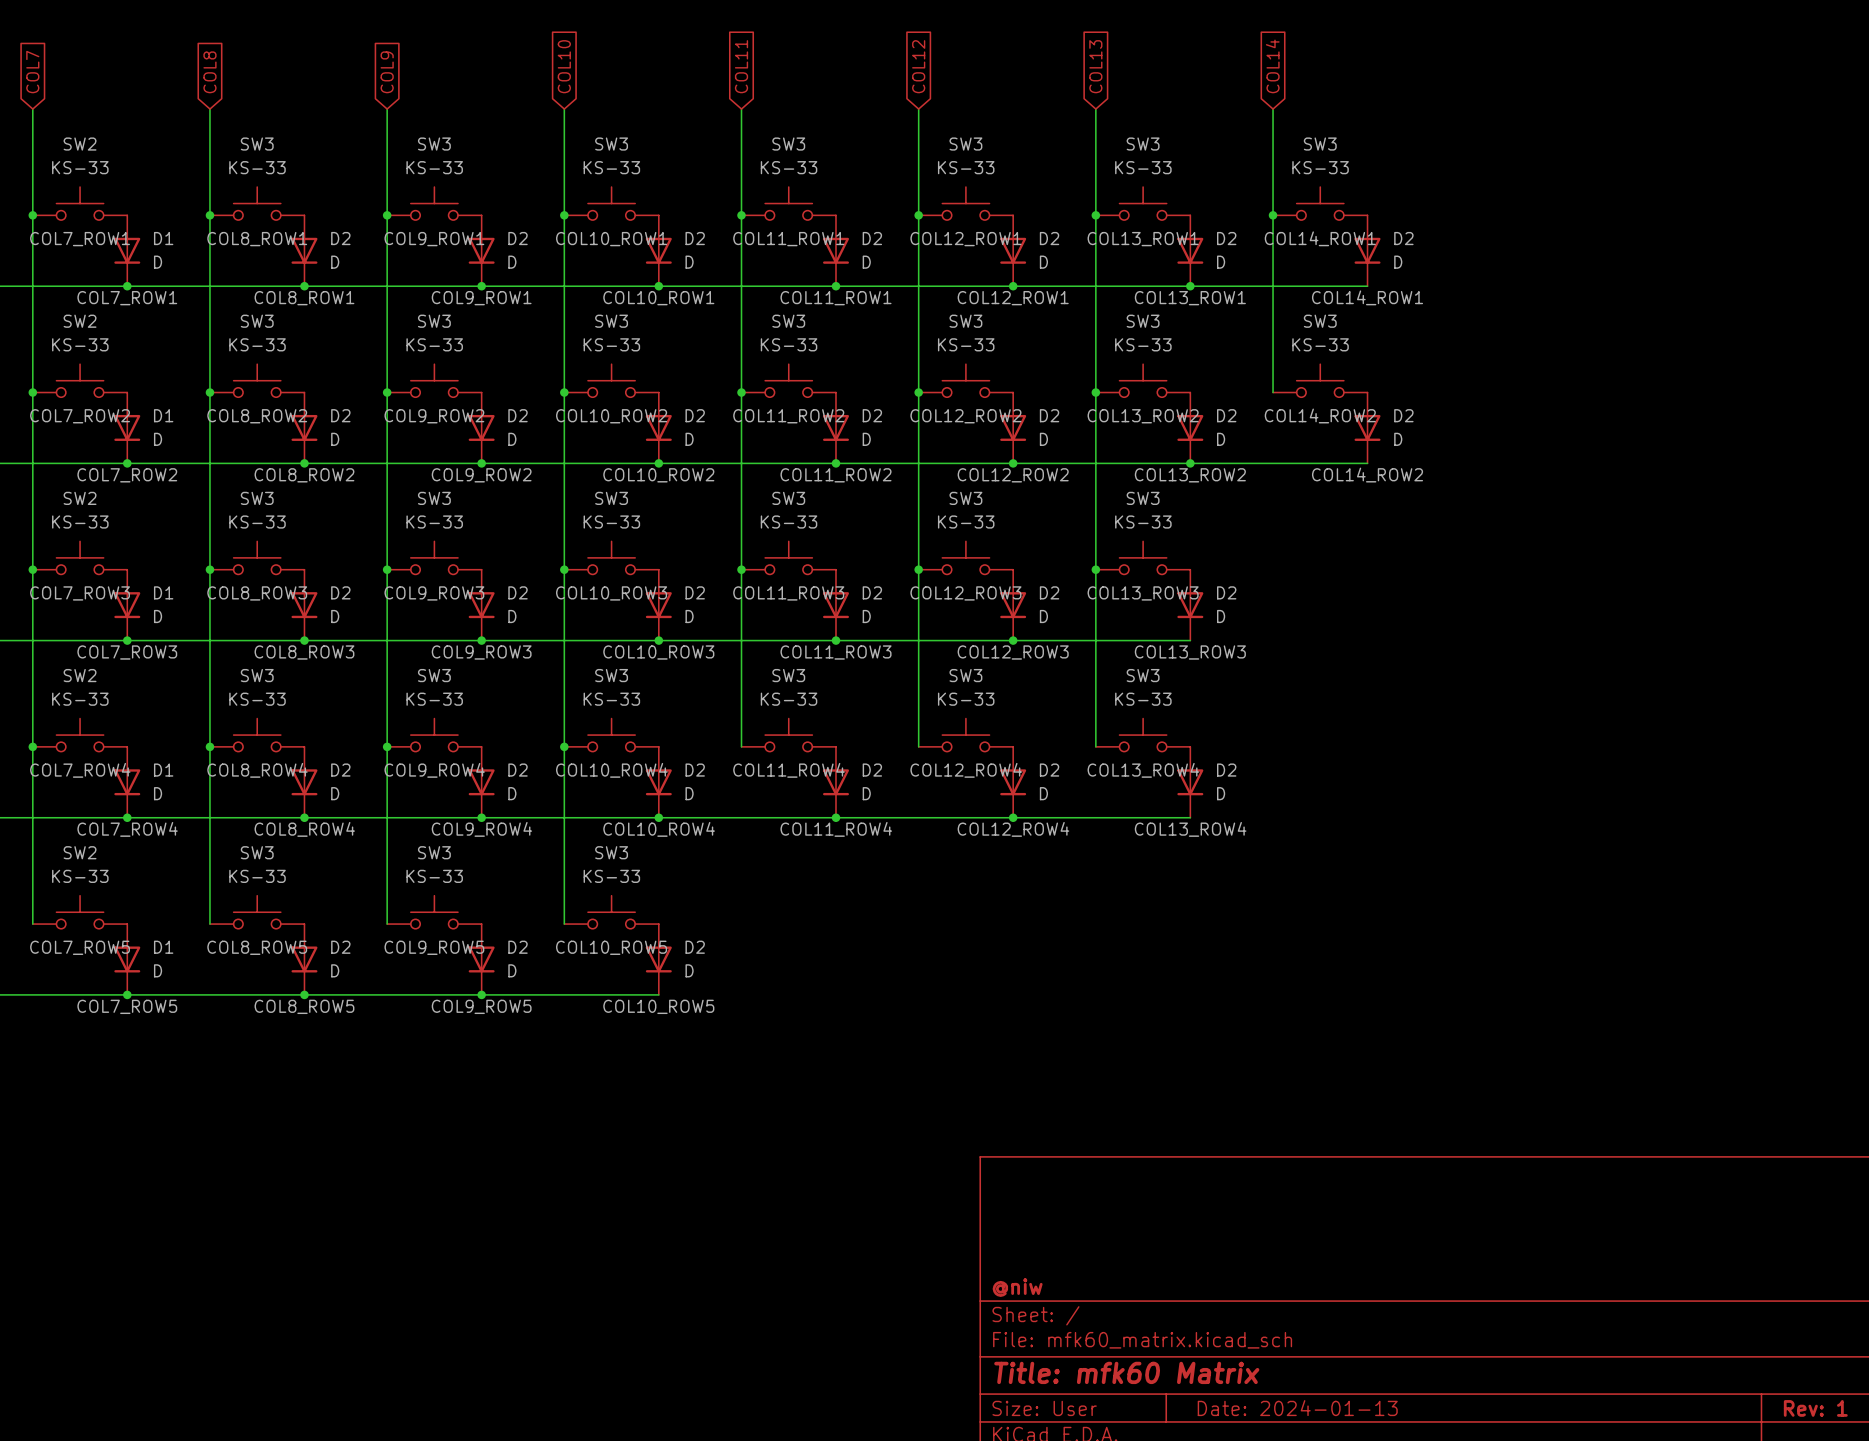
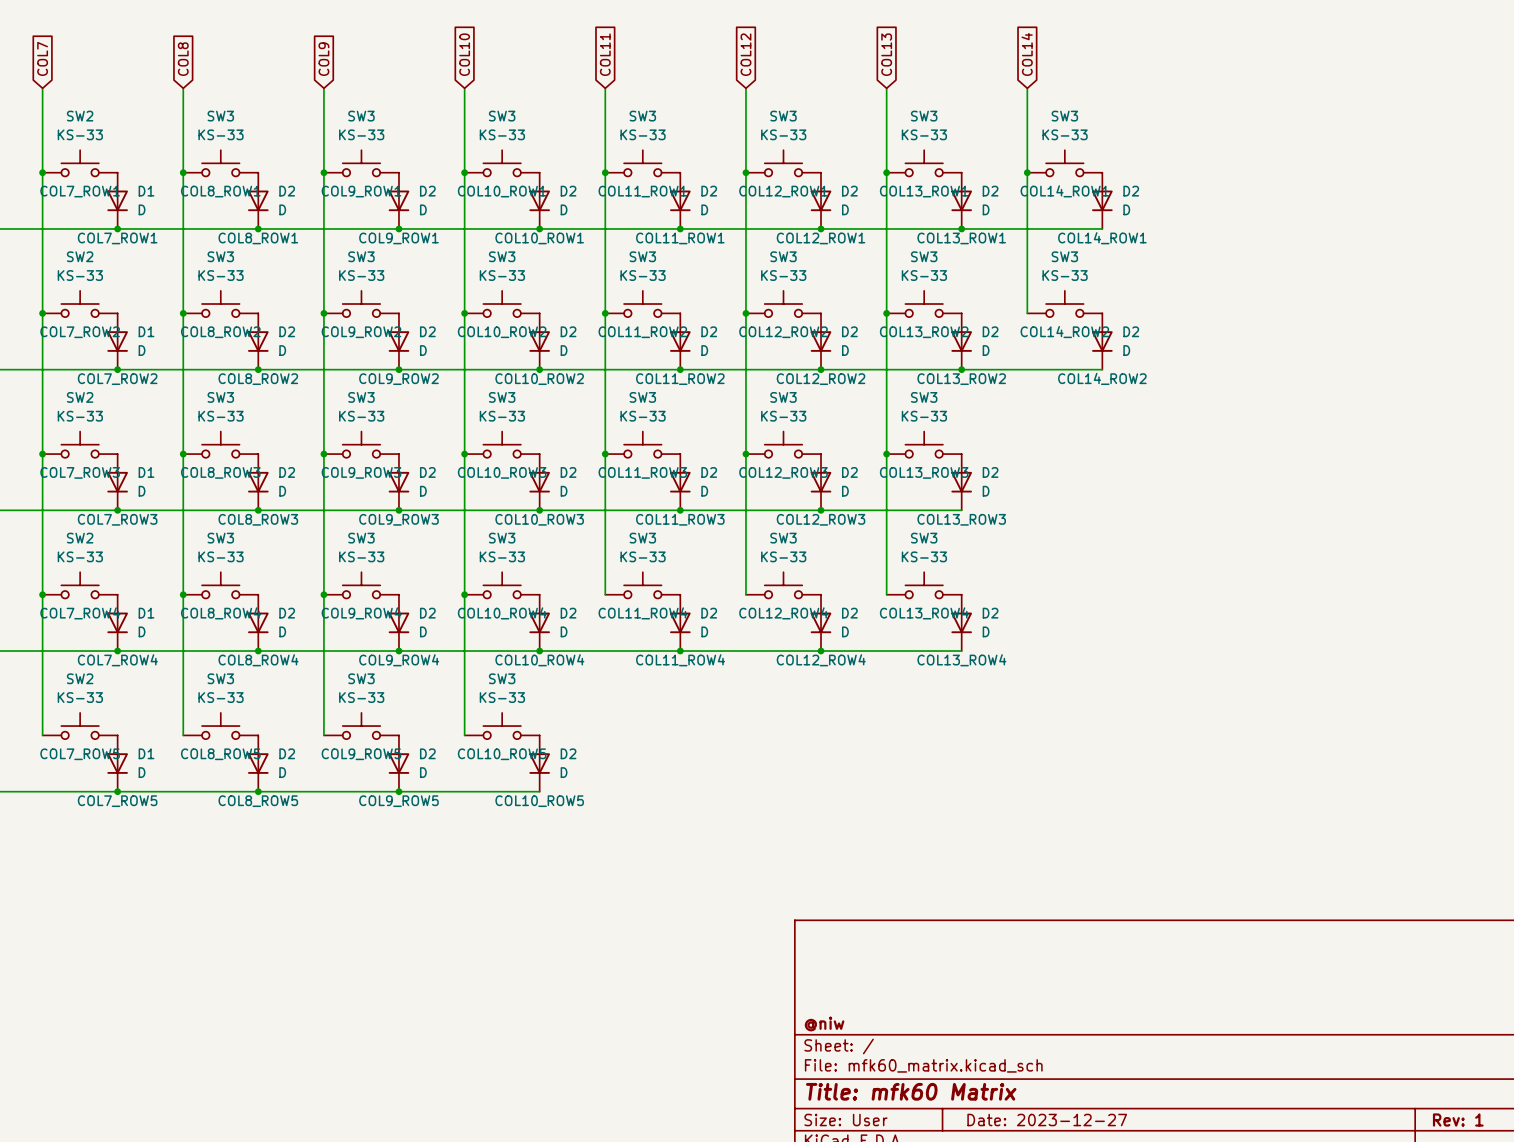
title block: Date: 2024-01-13 (1297, 1408) -> Date: 2023-12-27 (1047, 1120)

